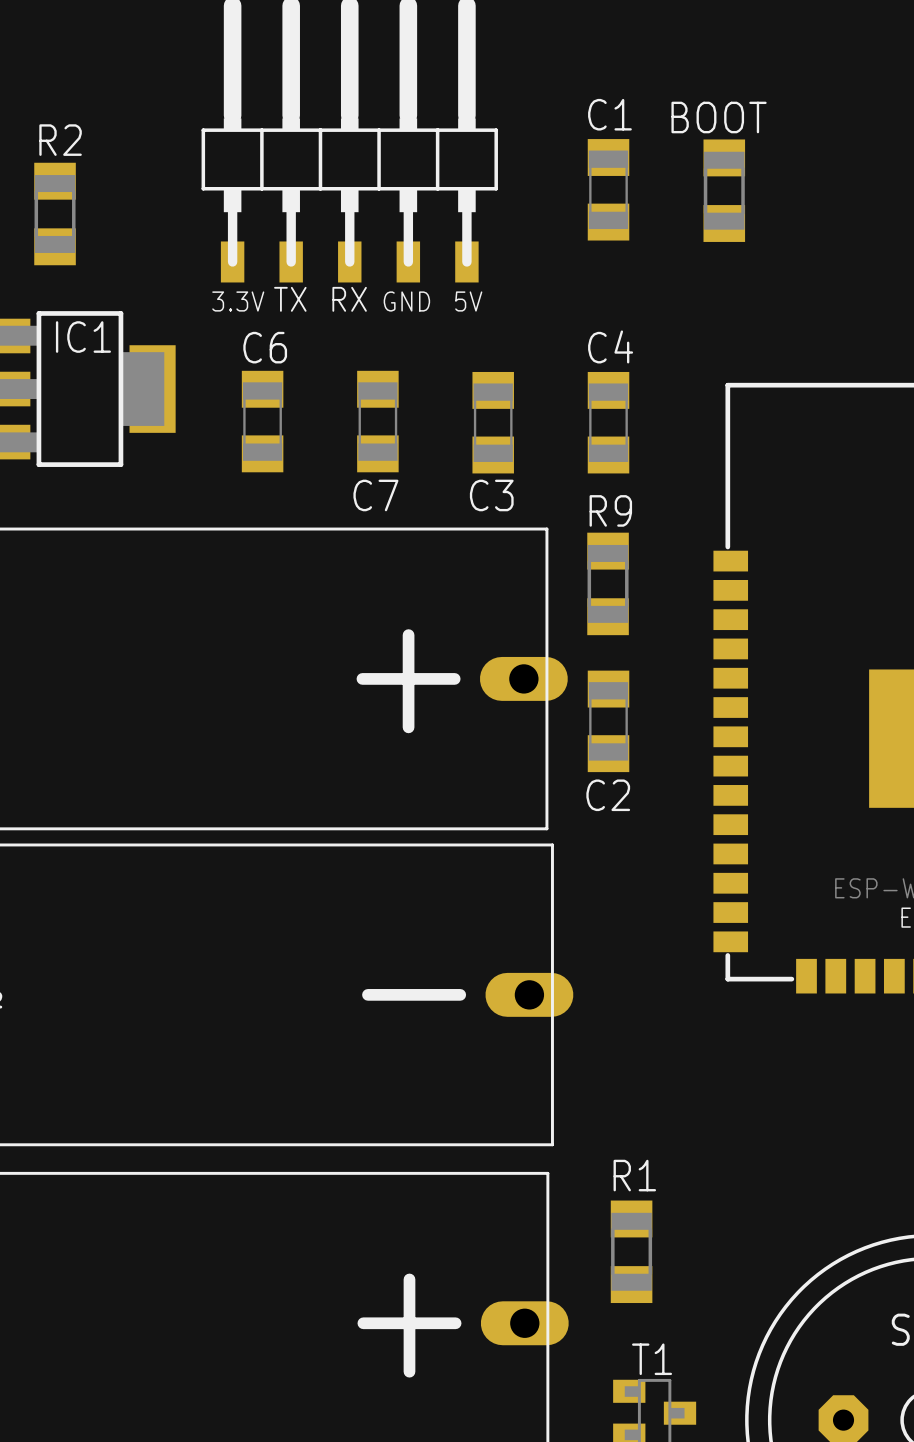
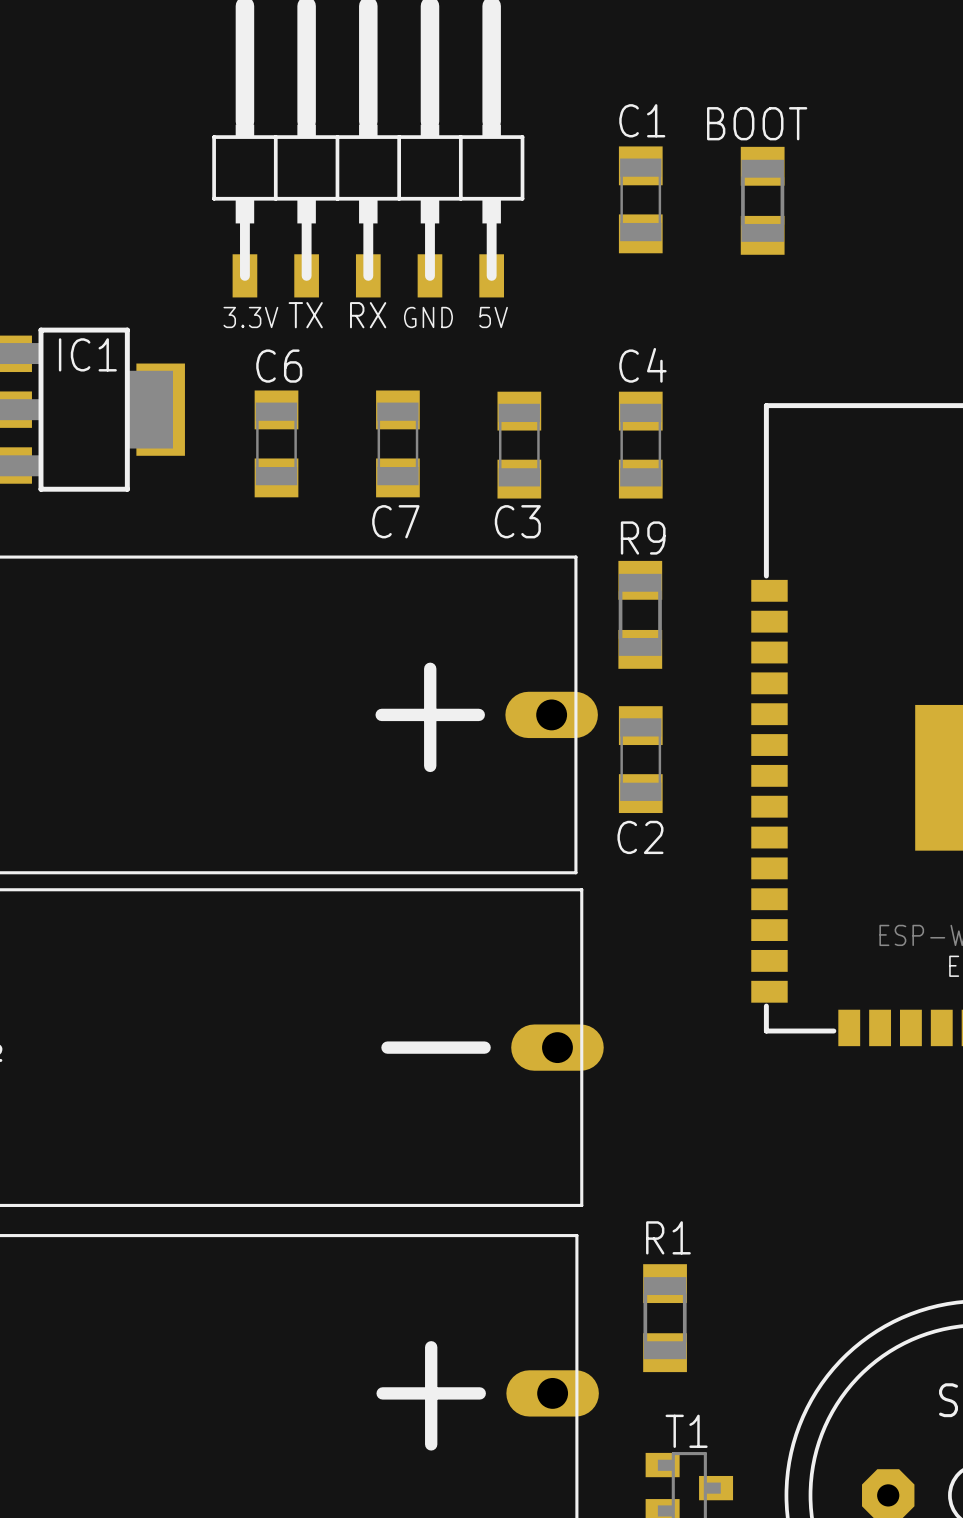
R2: (55, 214) -> none

